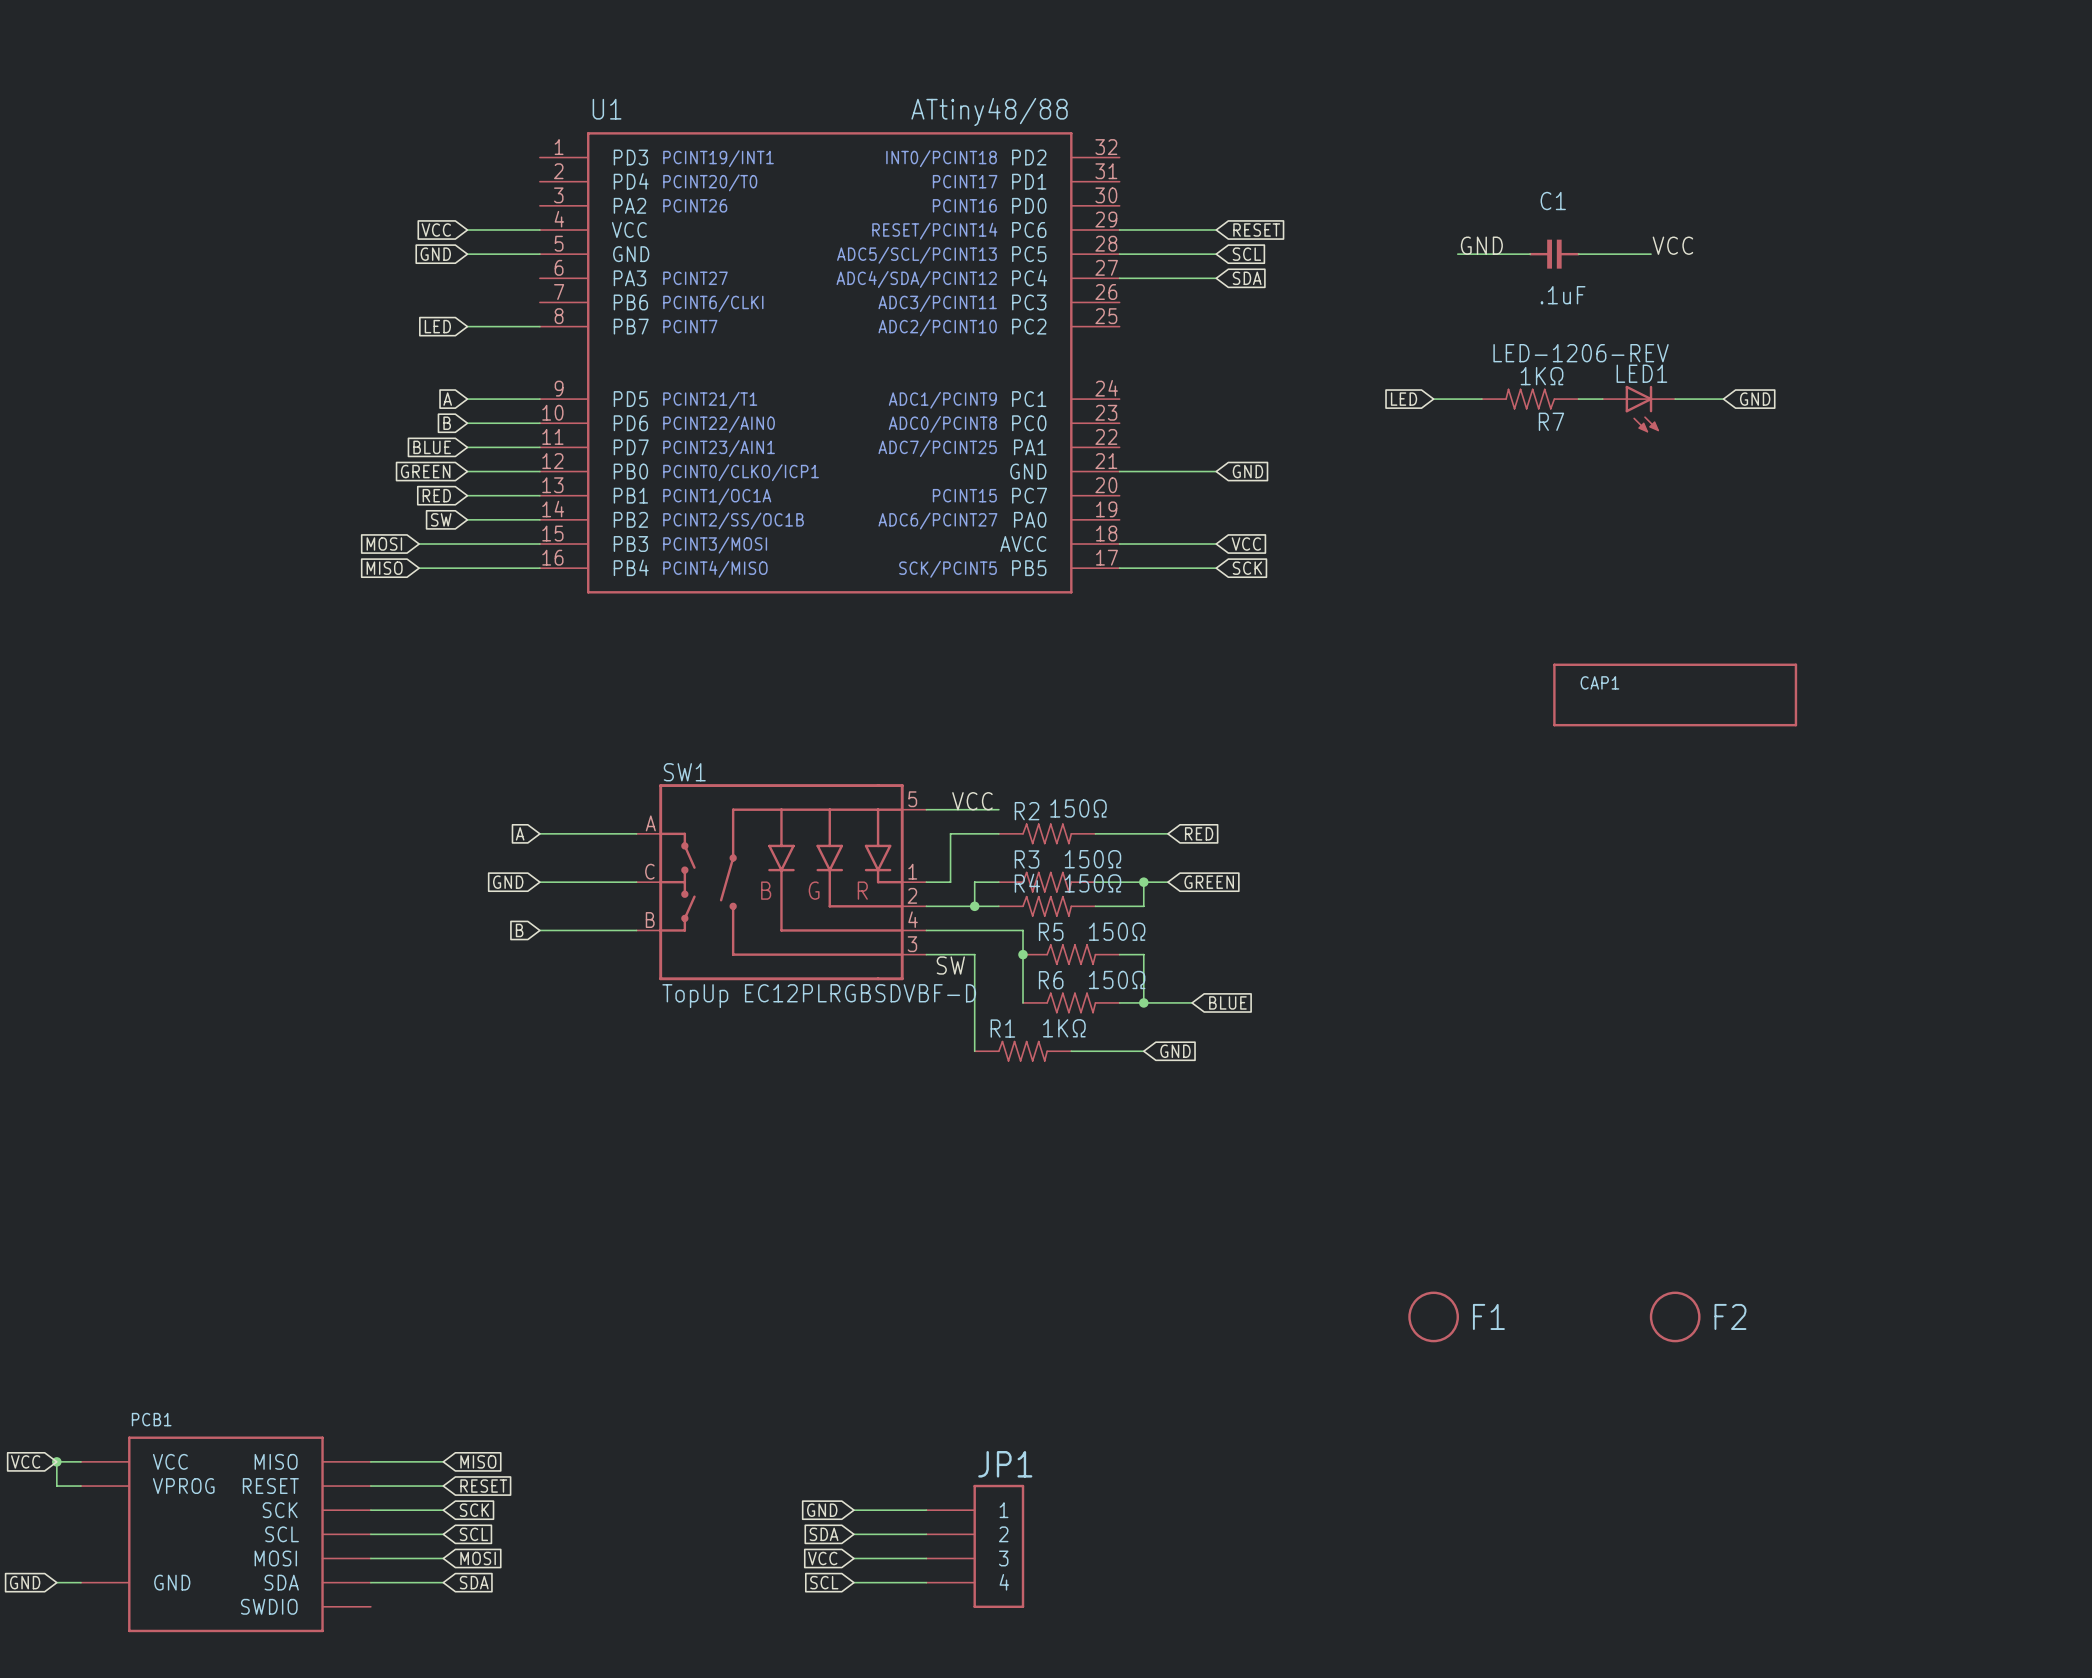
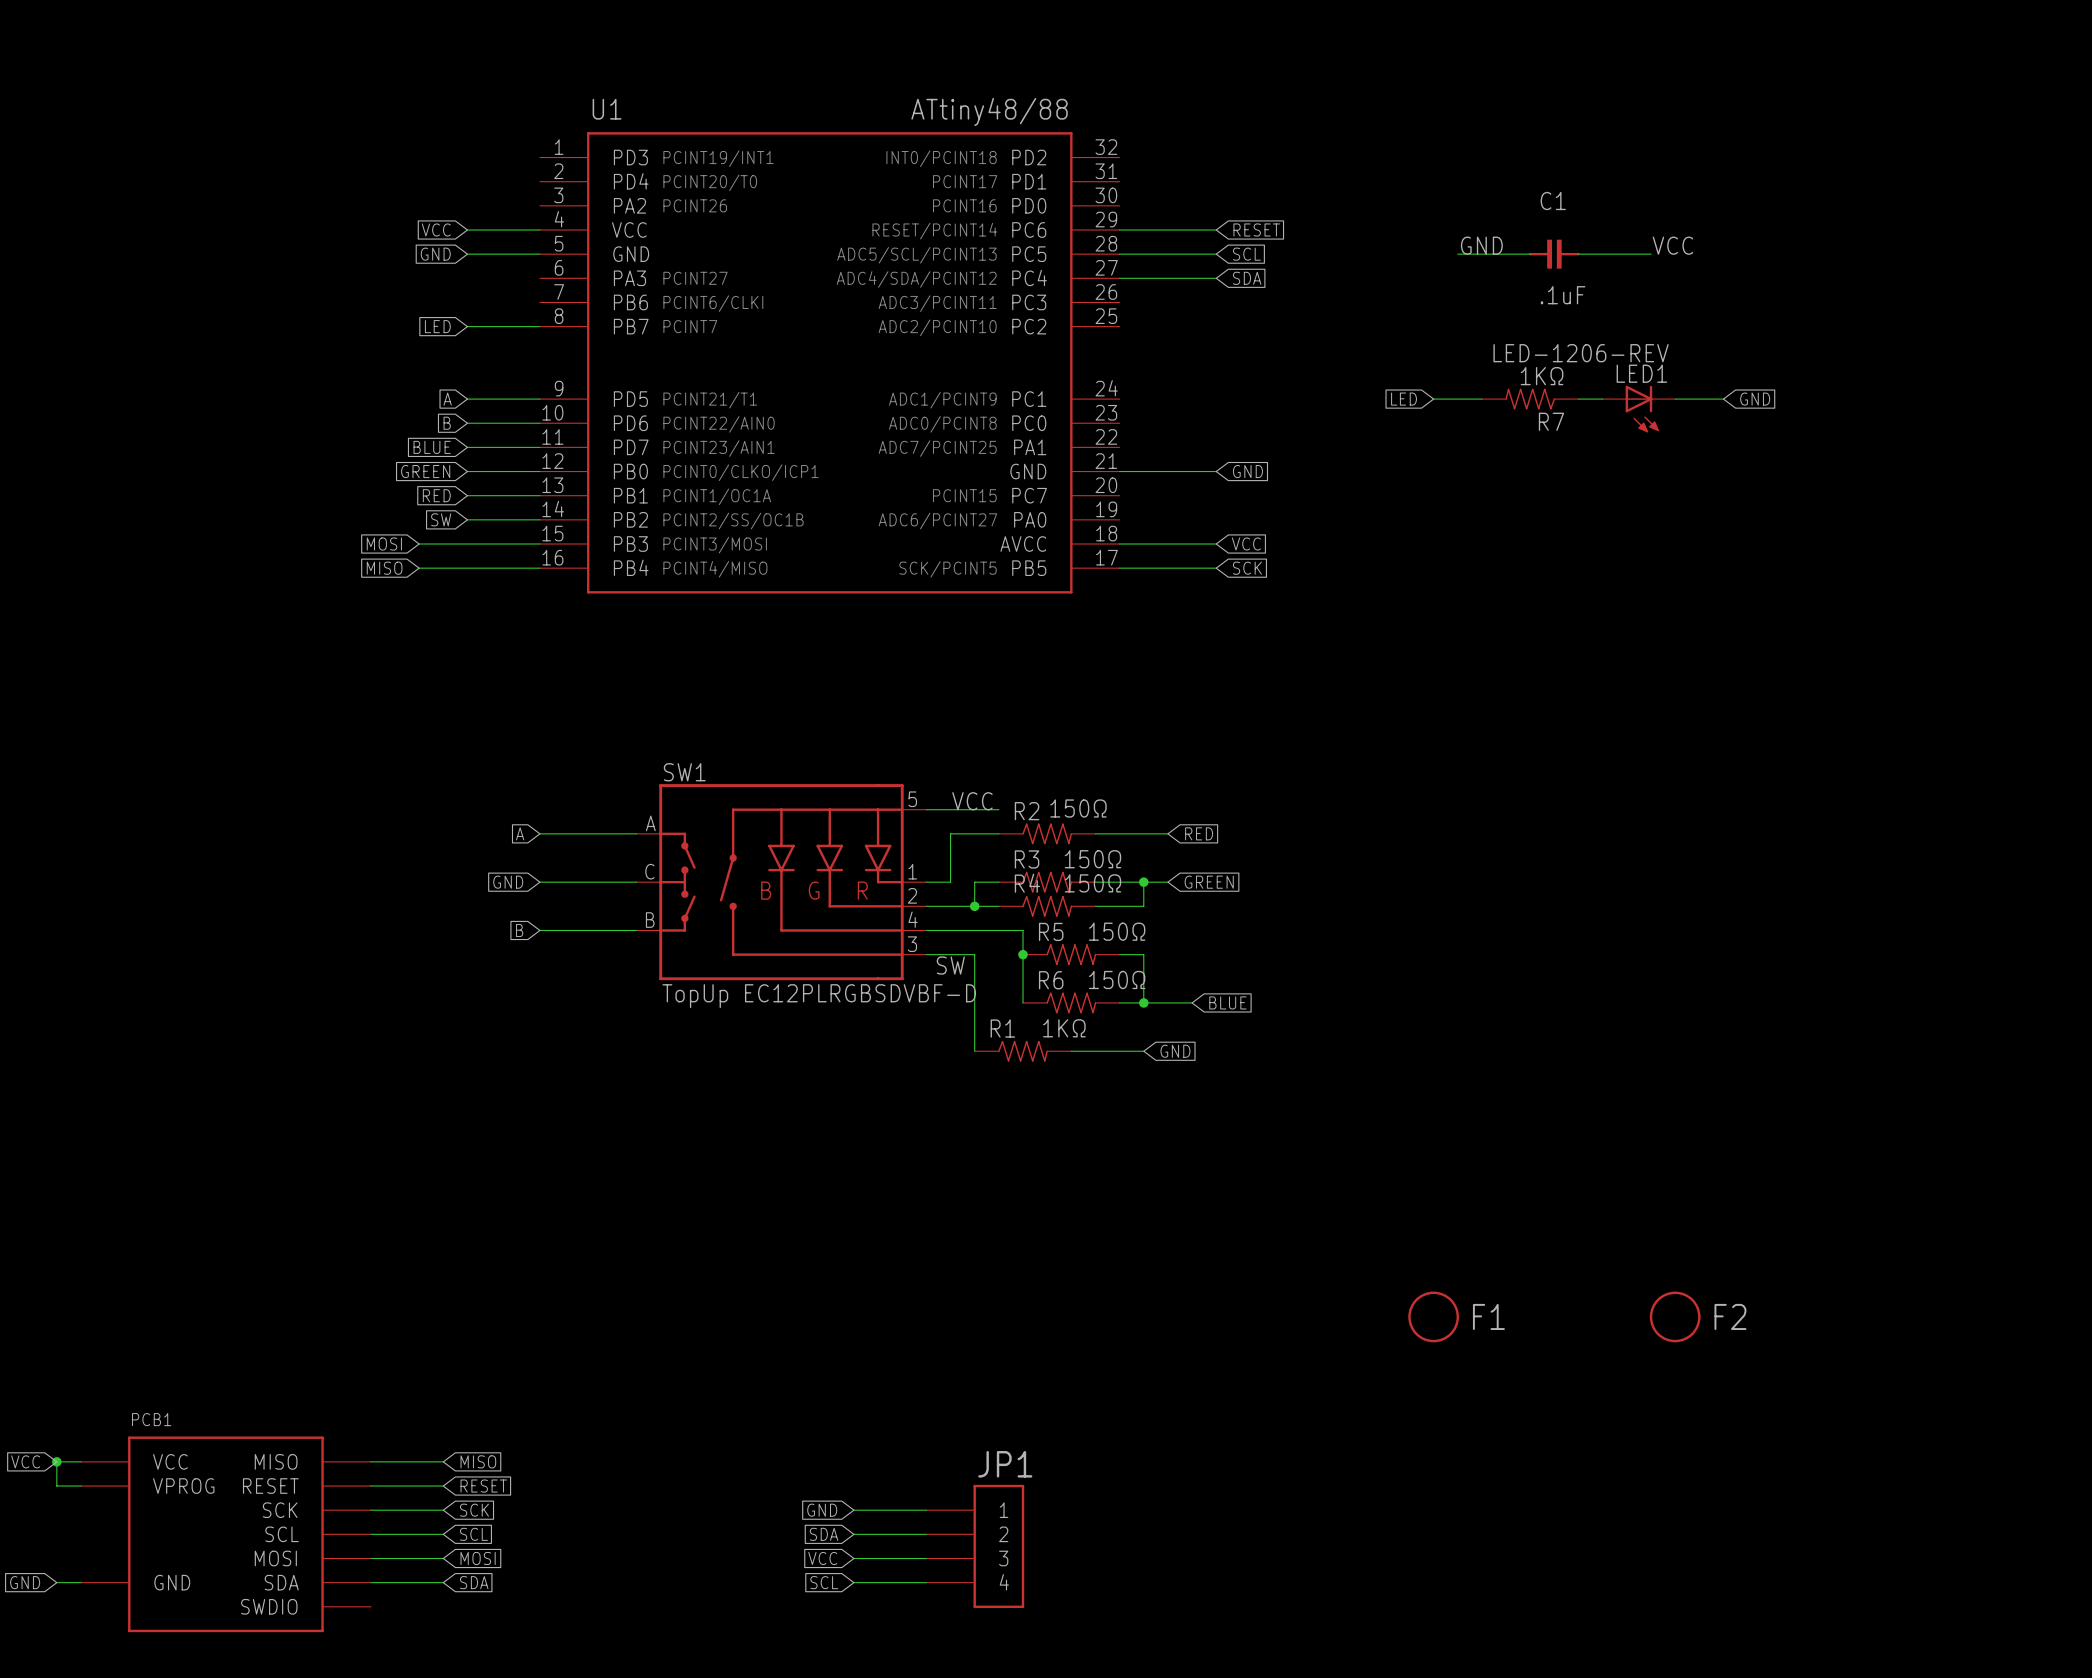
CAP1: (1675, 694) -> none

